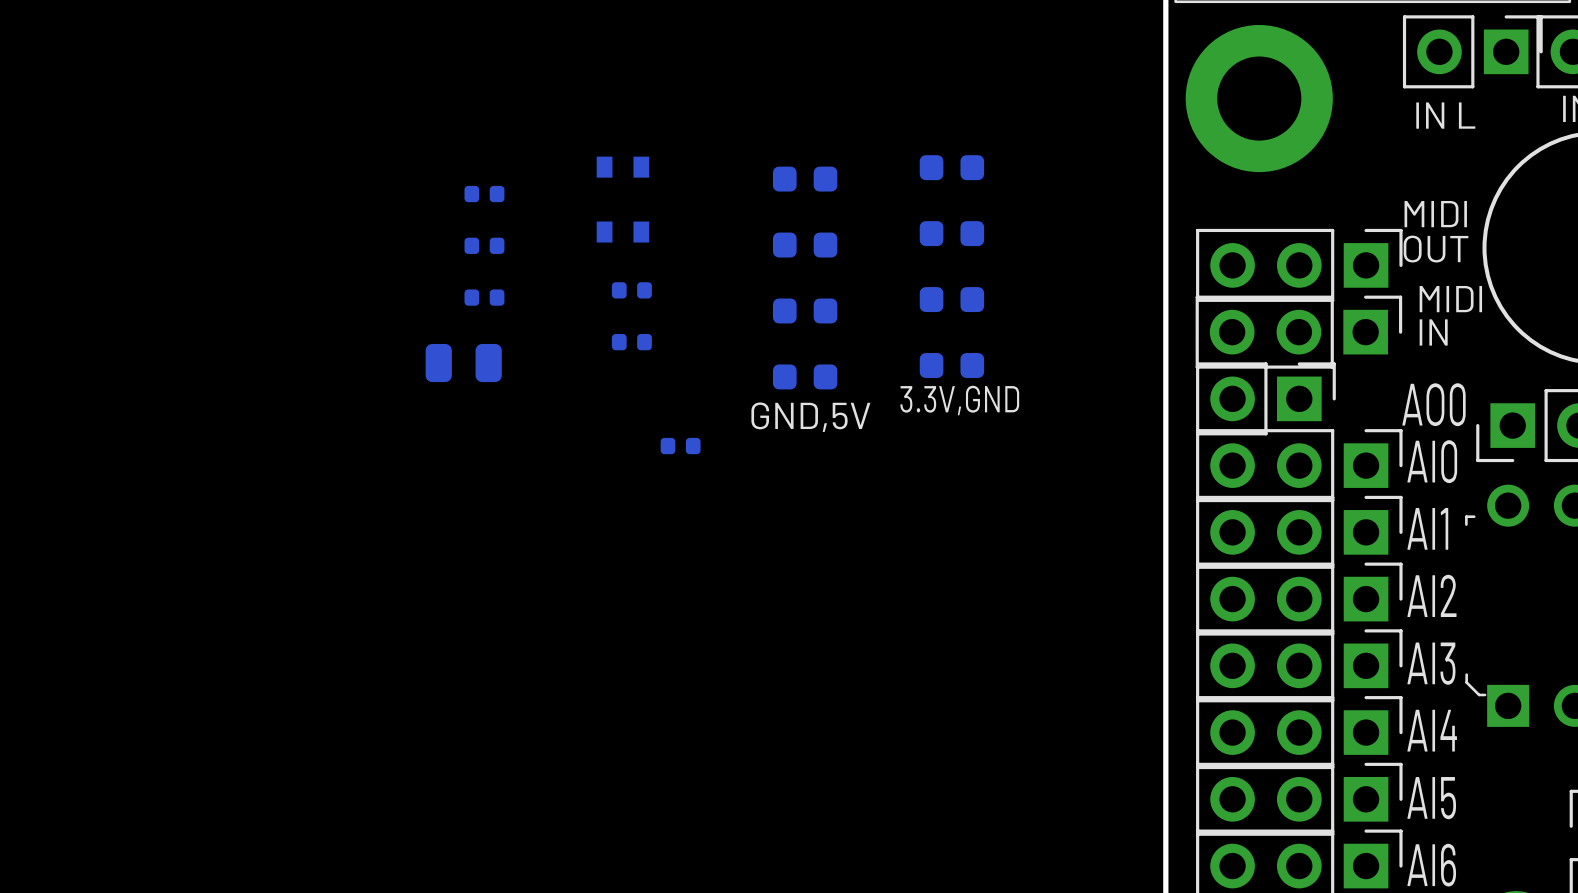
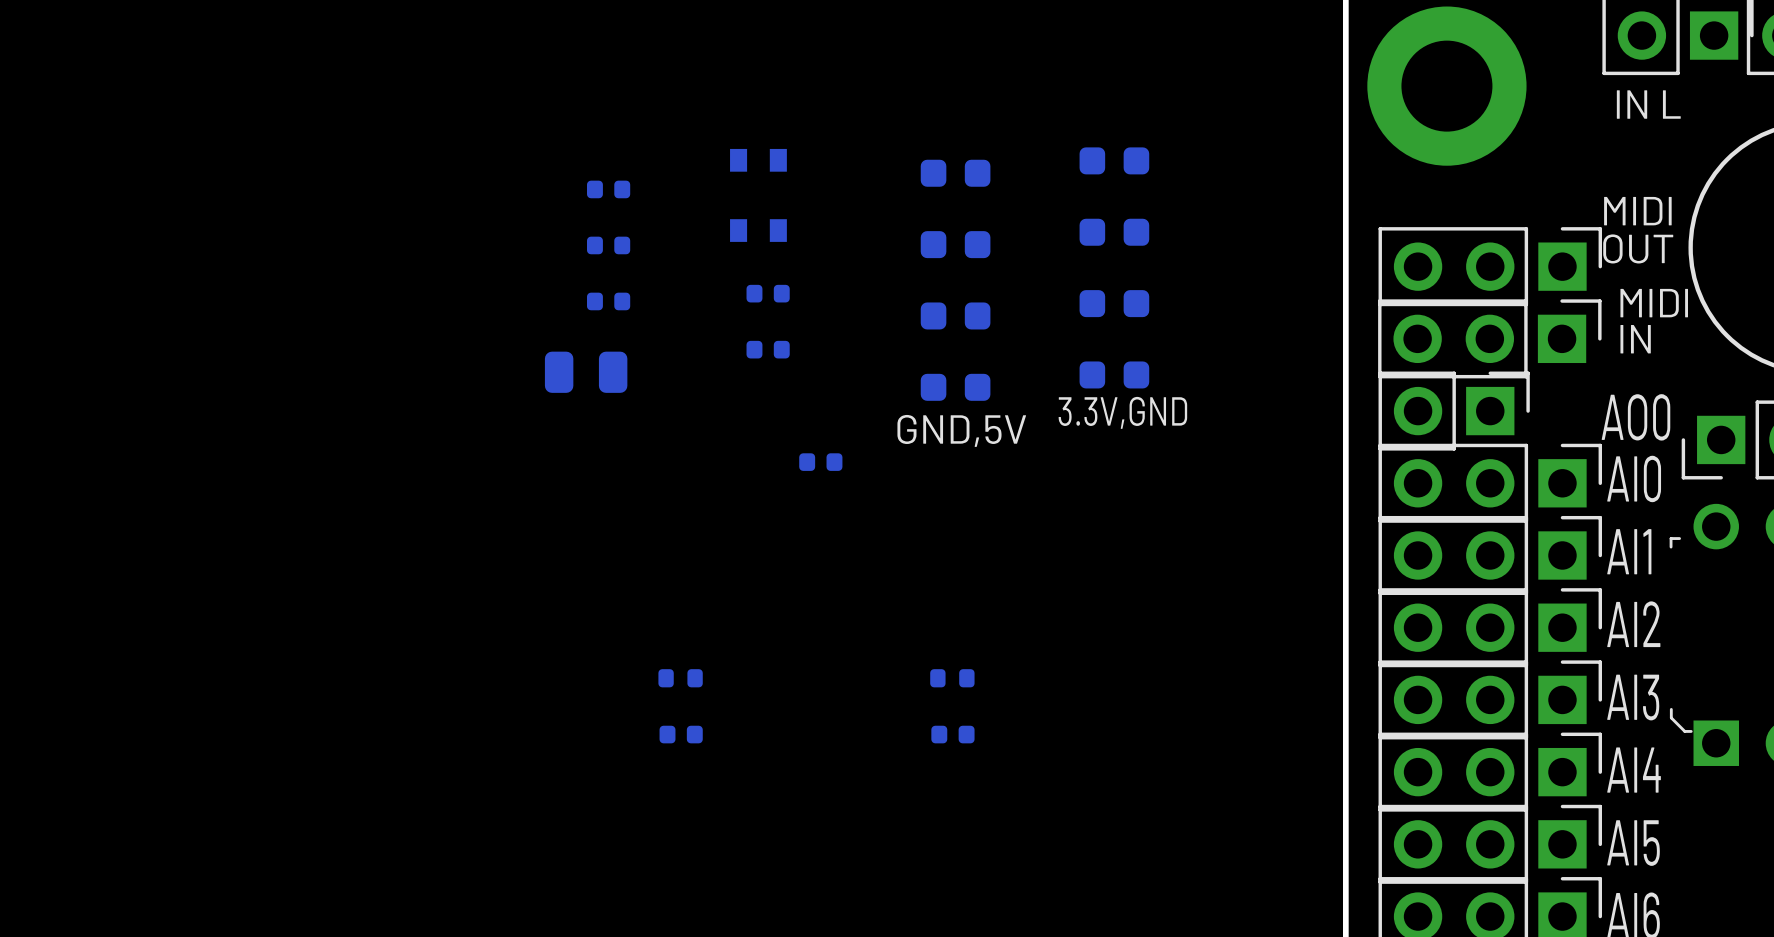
part: none -> (680, 678)
part: none -> (952, 678)
part: none -> (681, 734)
part: none -> (952, 734)

